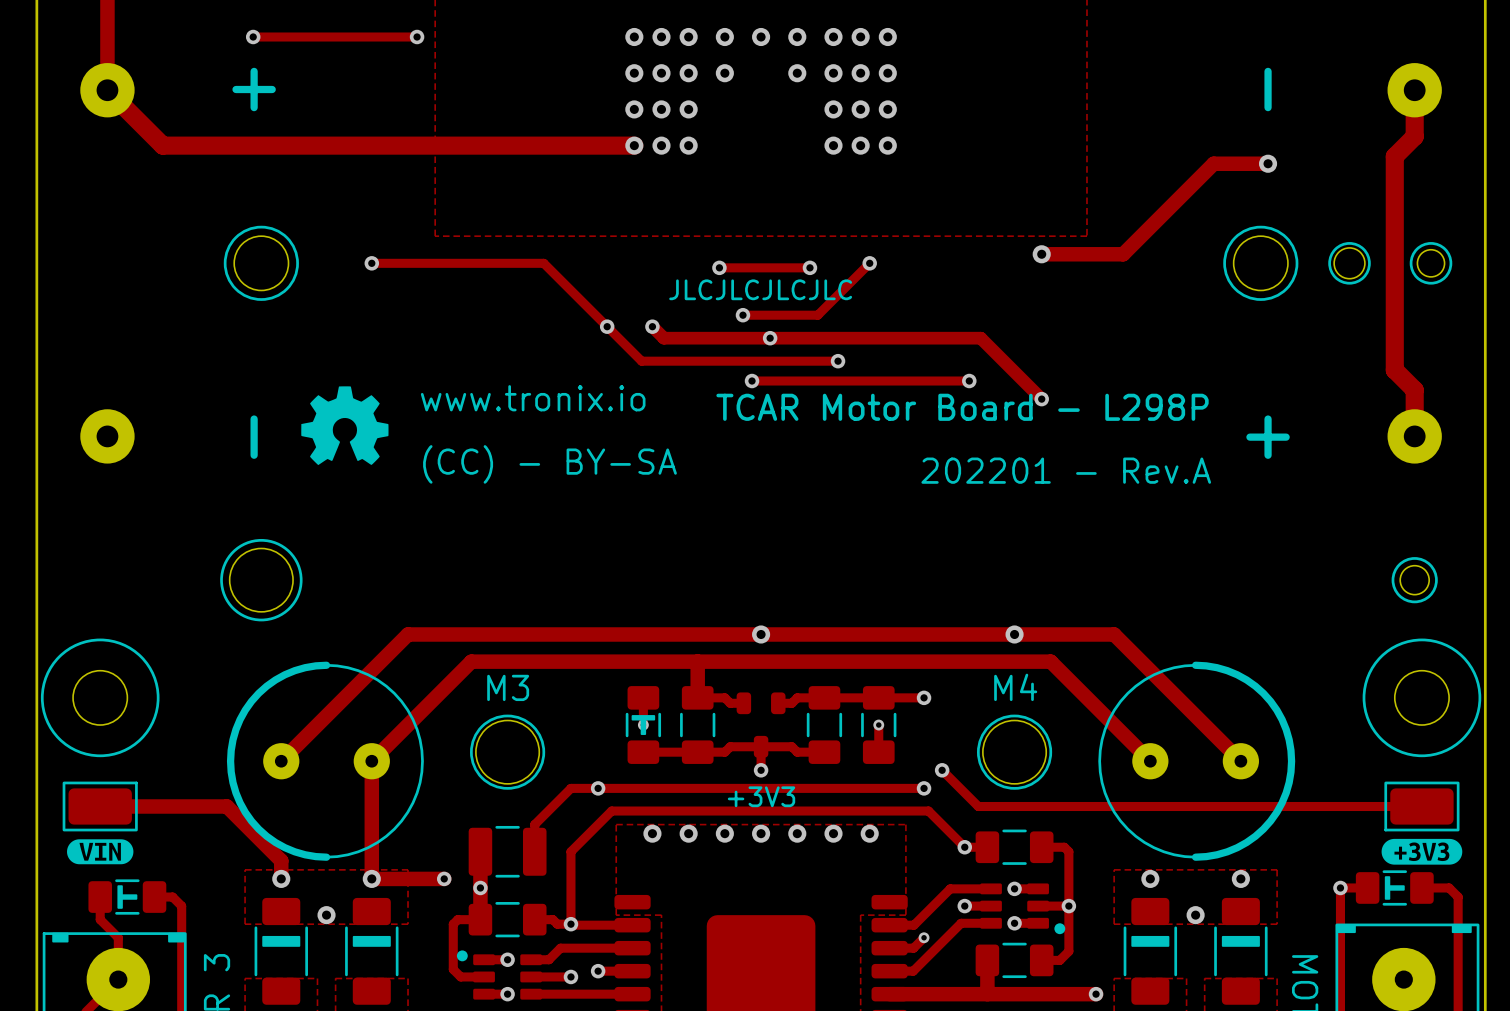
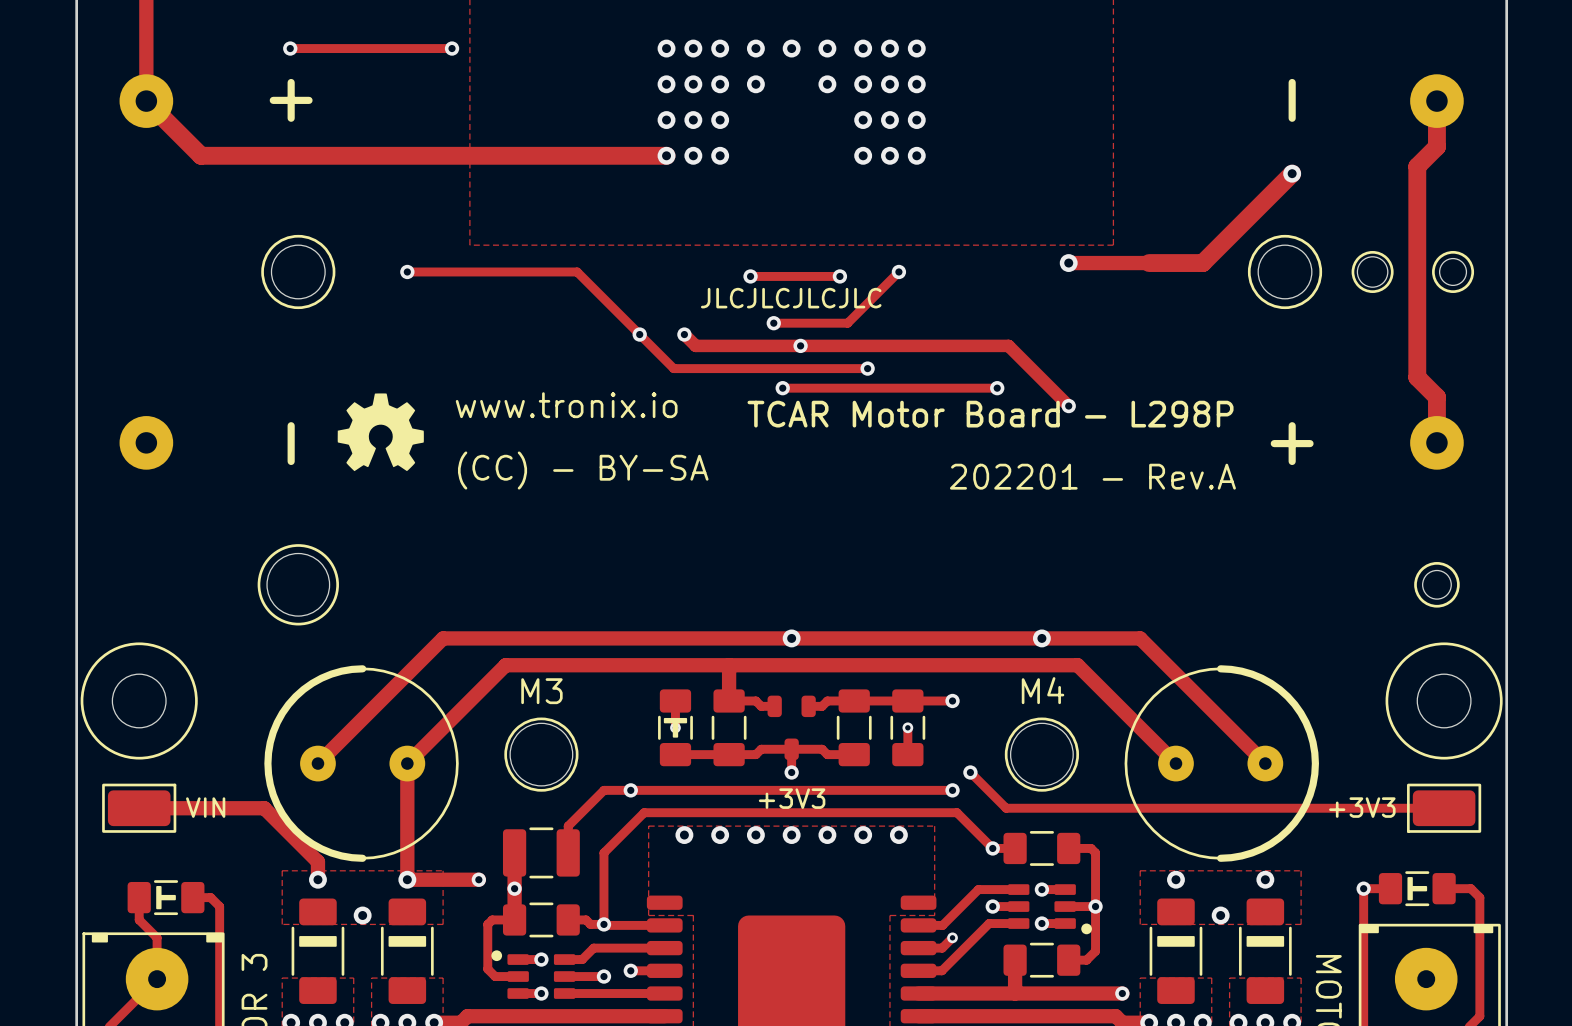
track: (1268, 163) (1213, 163) (1123, 254) -> (1292, 173) (1202, 263) (1149, 263)
text: none -> VIN (205, 807)
text: none -> +3V3 (1362, 807)
drawing: [1381, 838, 1463, 865] -> none
drawing: [67, 839, 134, 865] -> none

